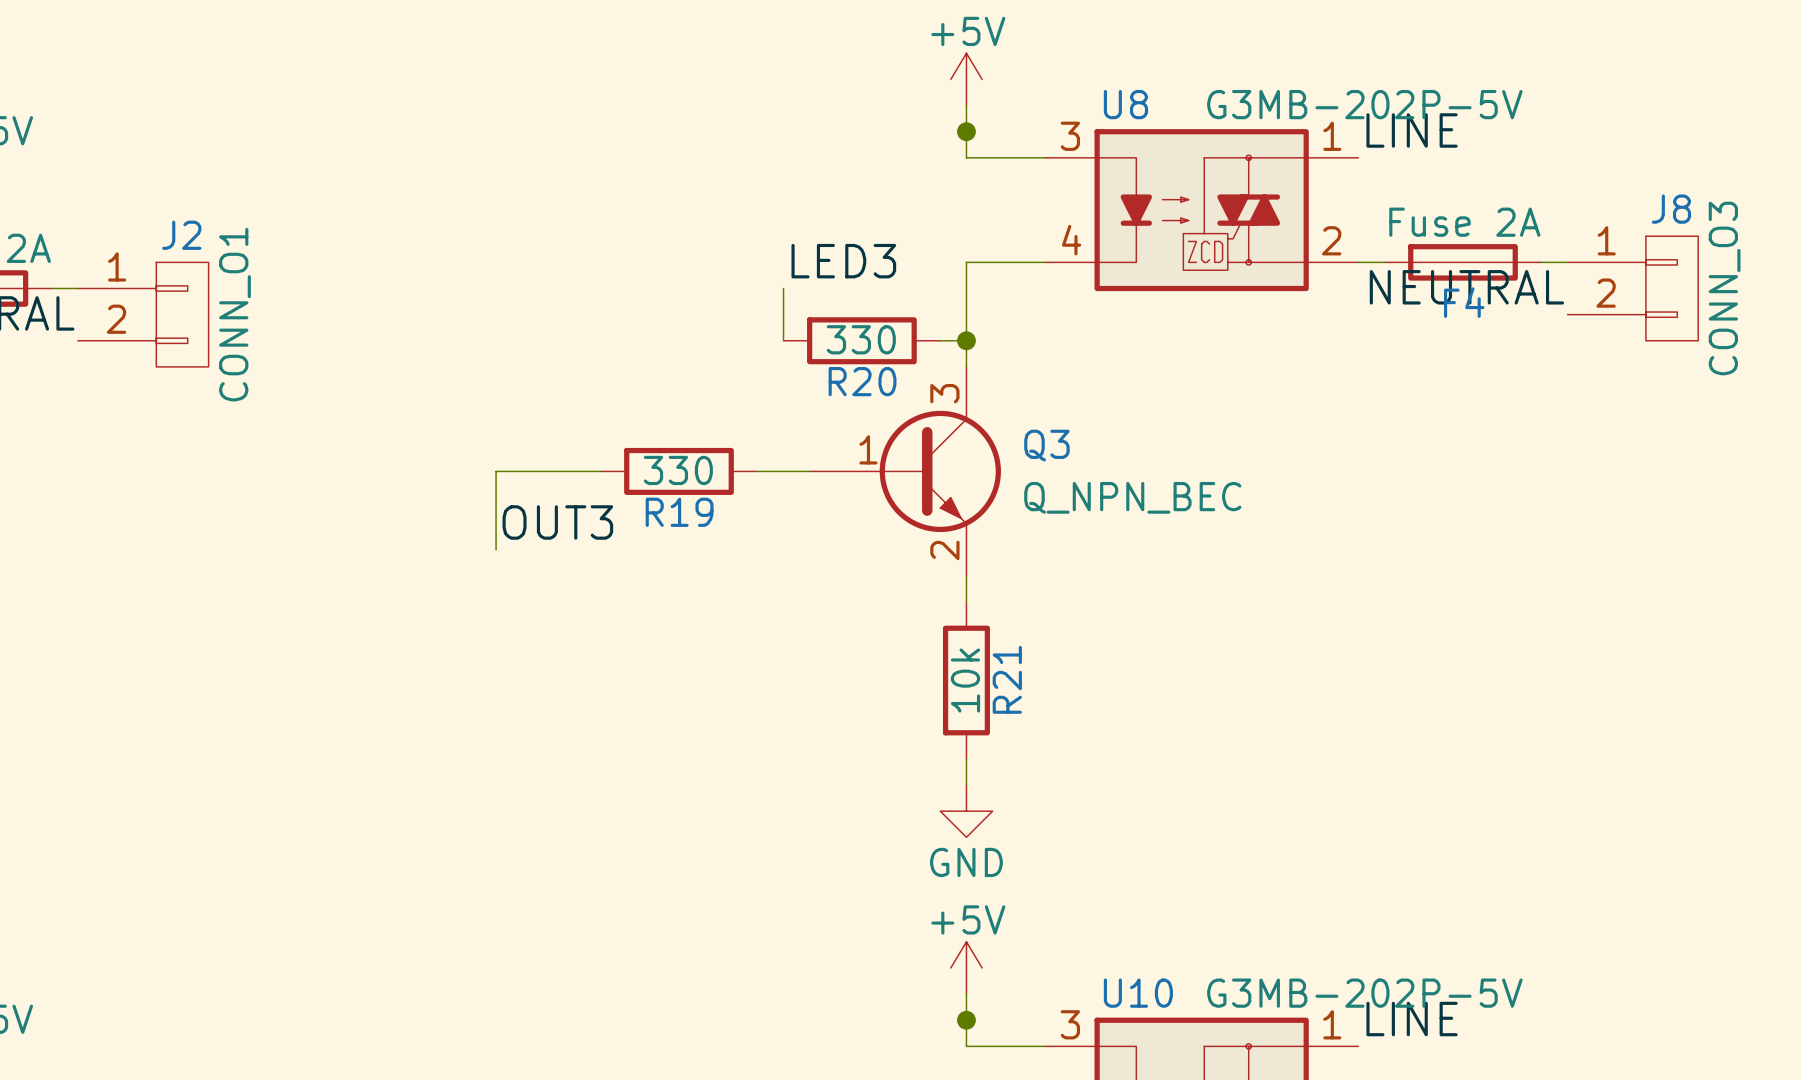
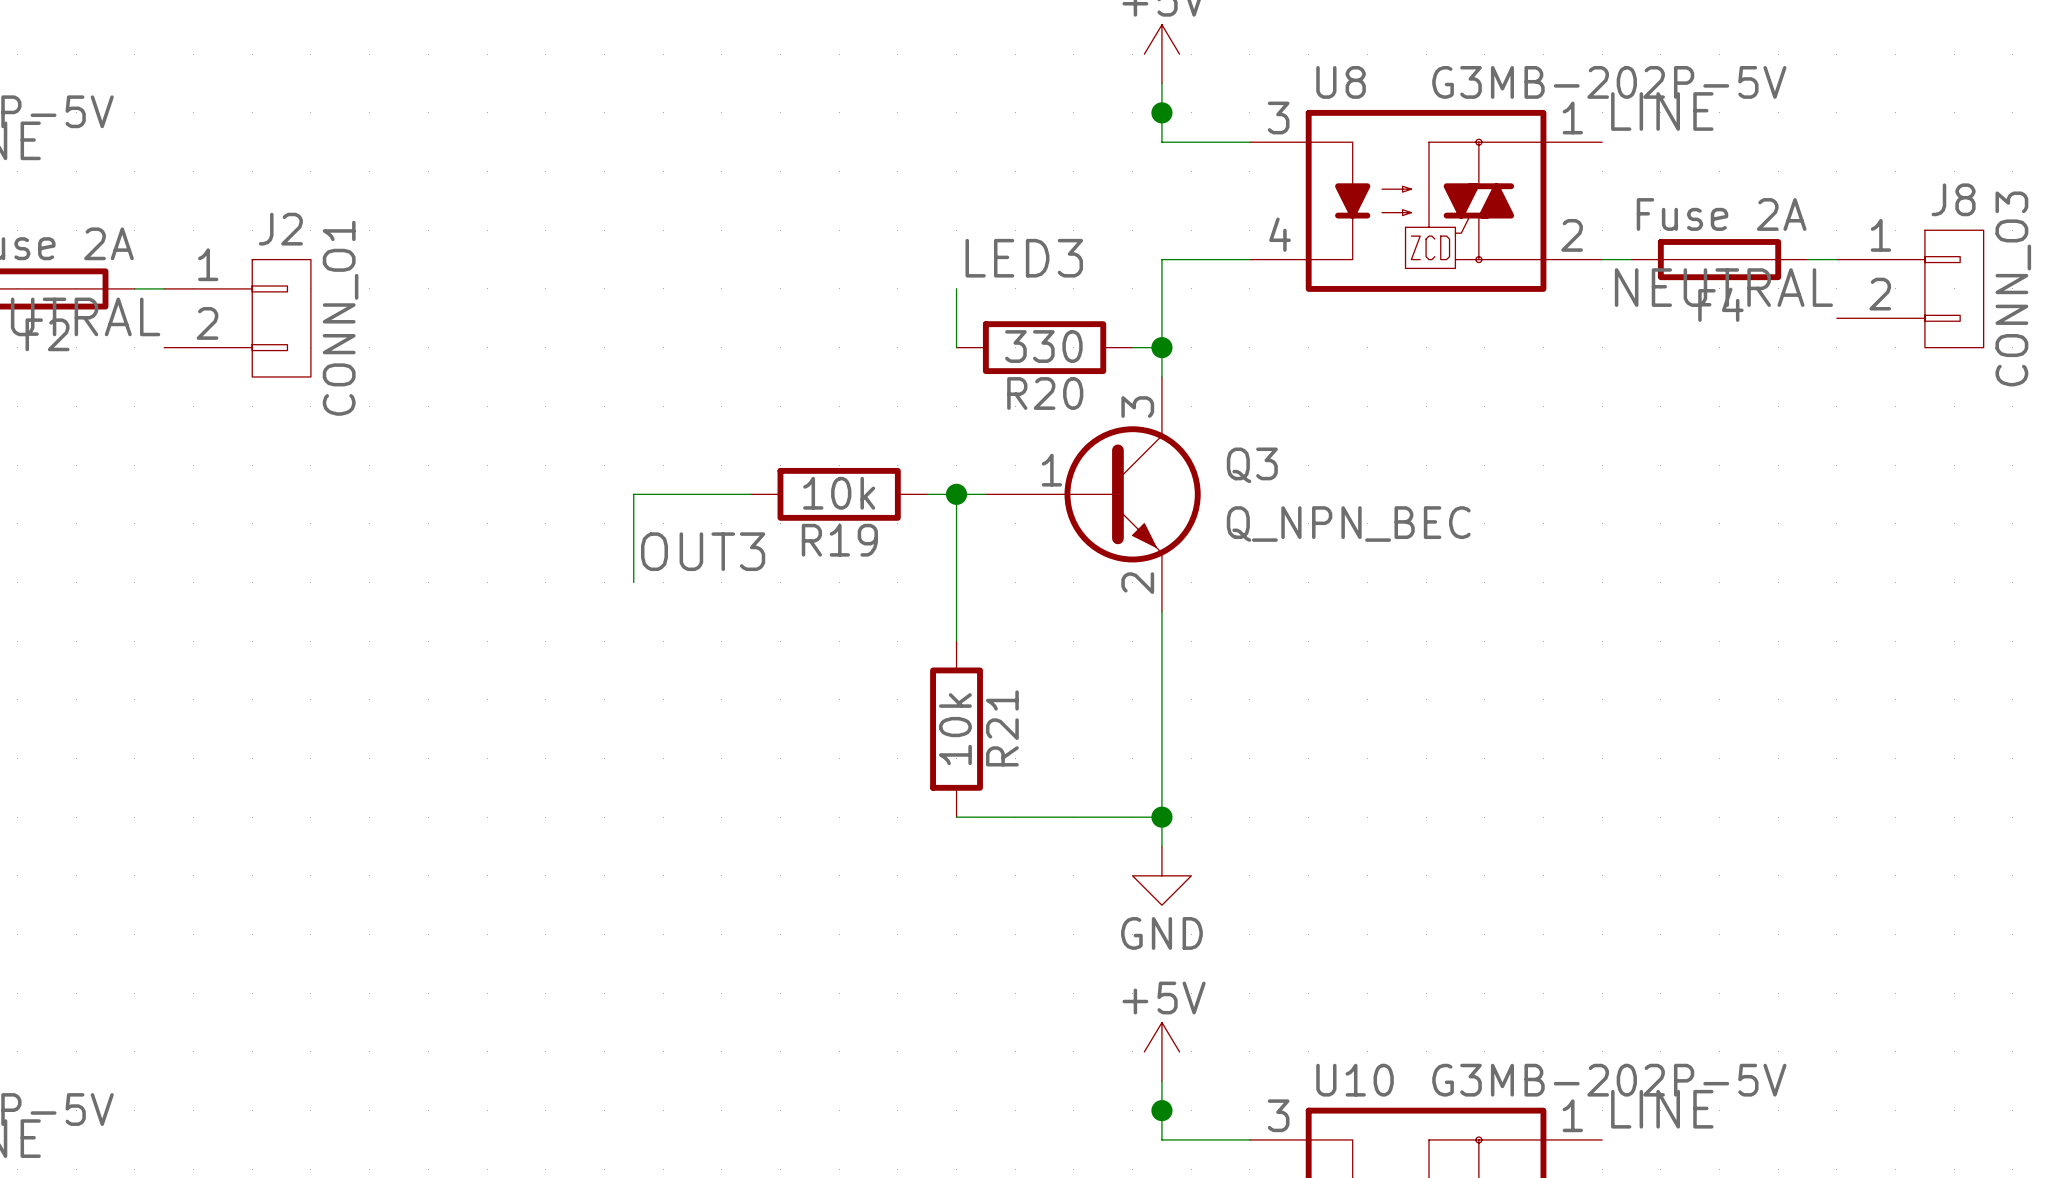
R19 value: 330 (678, 470) -> 10k (839, 493)
wire: none -> (956, 494) (956, 641)
junction: none -> (956, 494)
wire: none -> (1161, 641) (1161, 817) (956, 817)
R21 position: (966, 680) -> (956, 729)
junction: none -> (1161, 817)

